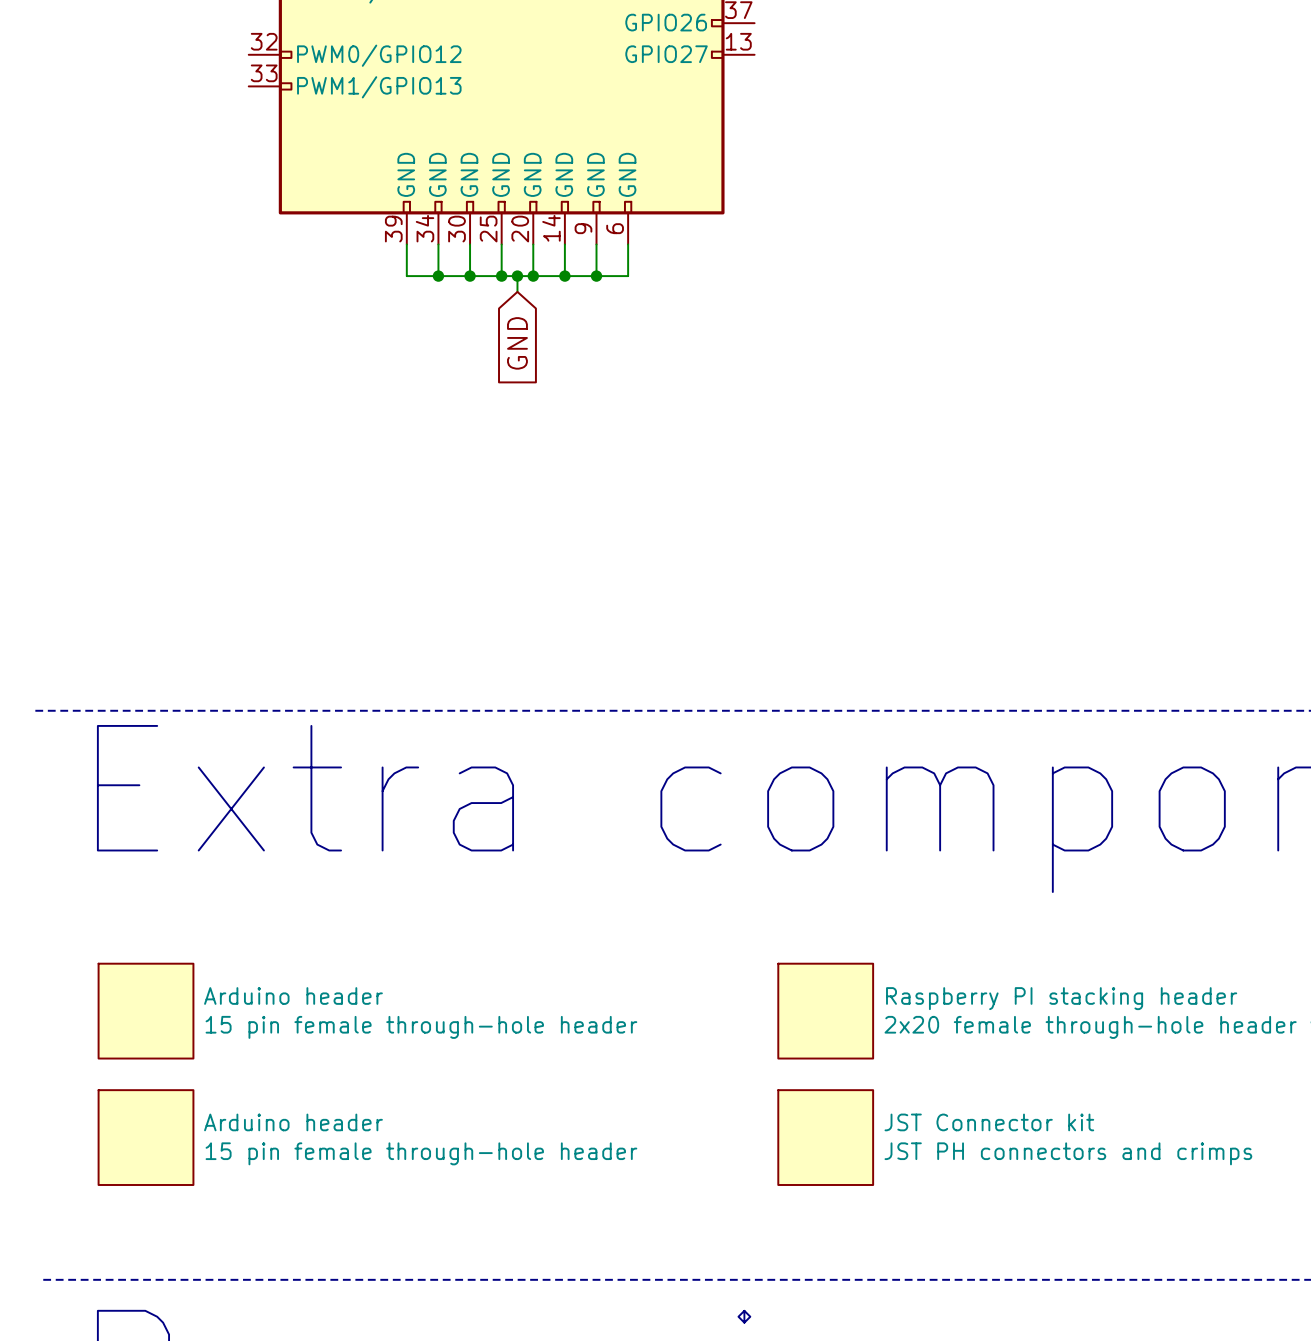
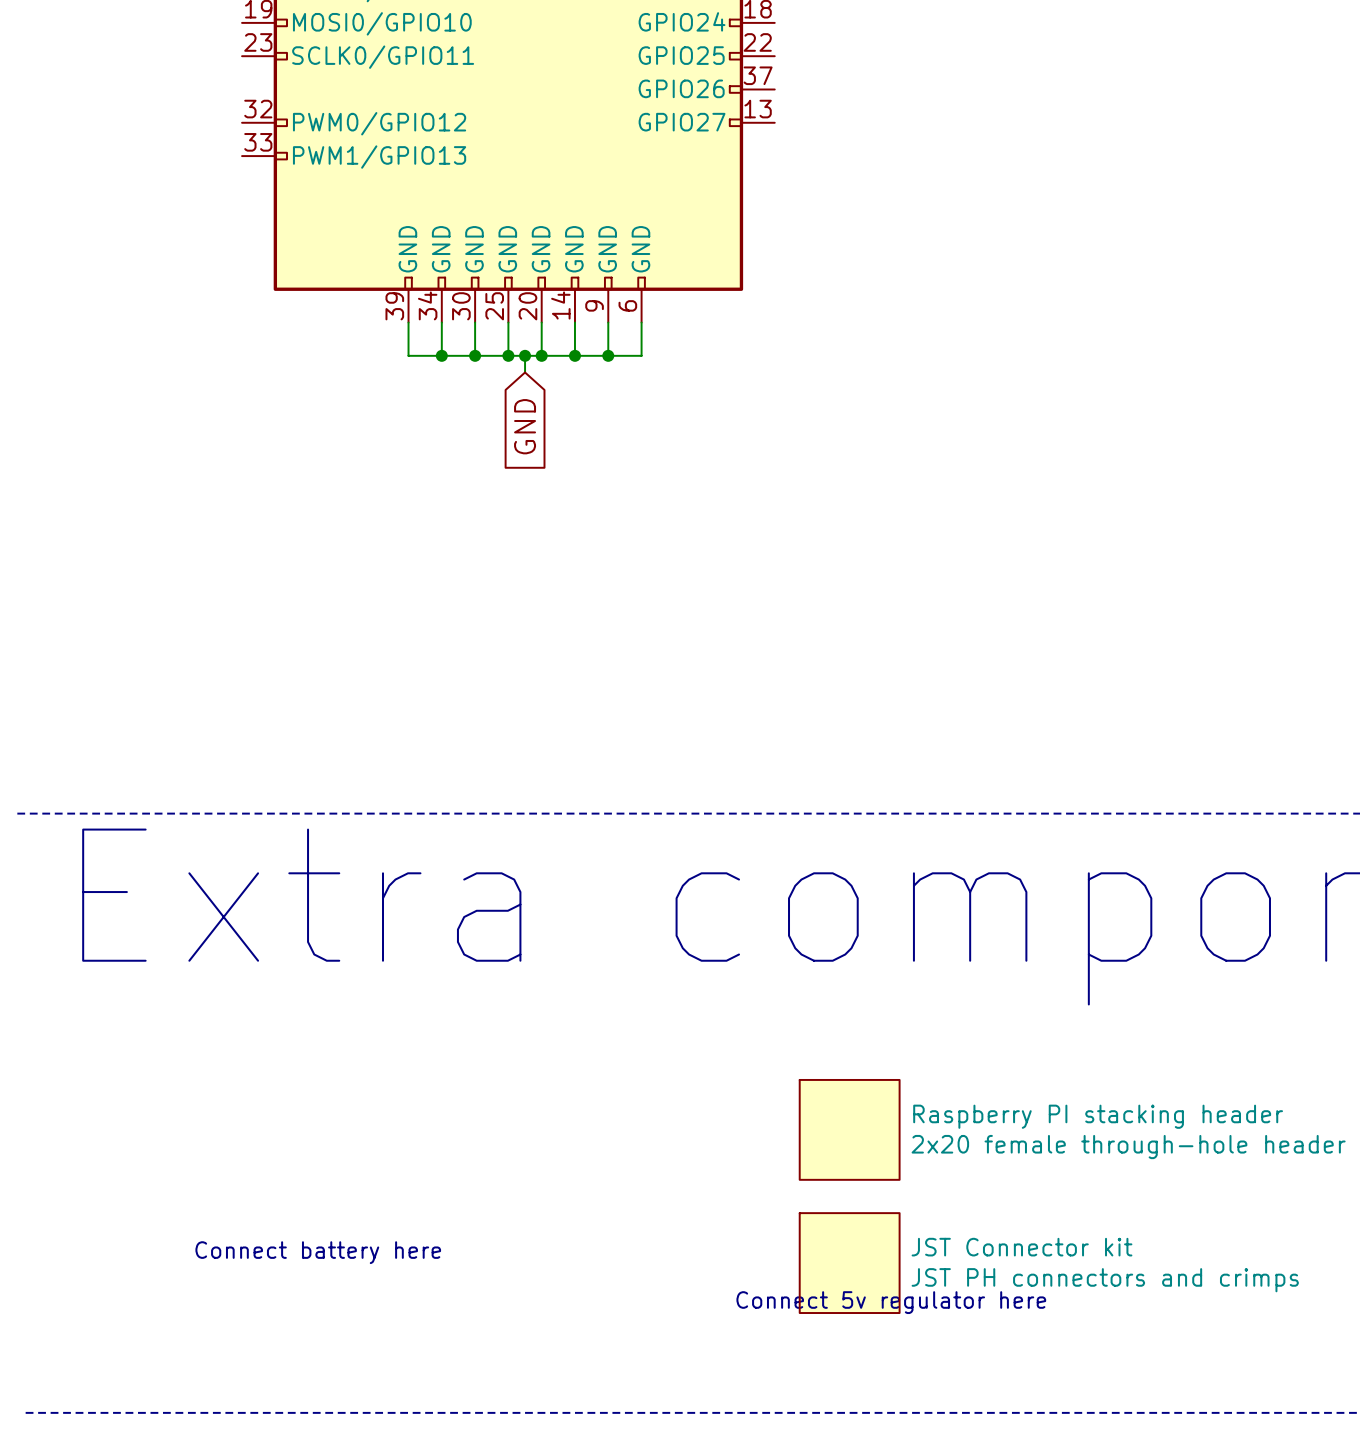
part: Arduino header (146, 1011) -> none
text: none -> Connect battery here (318, 1252)
part: Arduino header (146, 1137) -> none
text: none -> Connect 5v regulator here (891, 1302)

